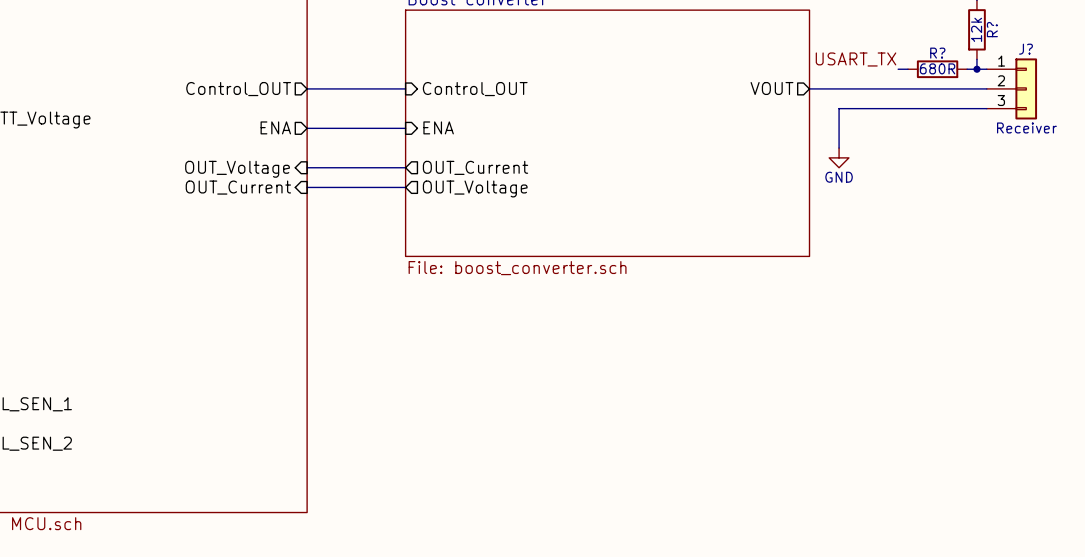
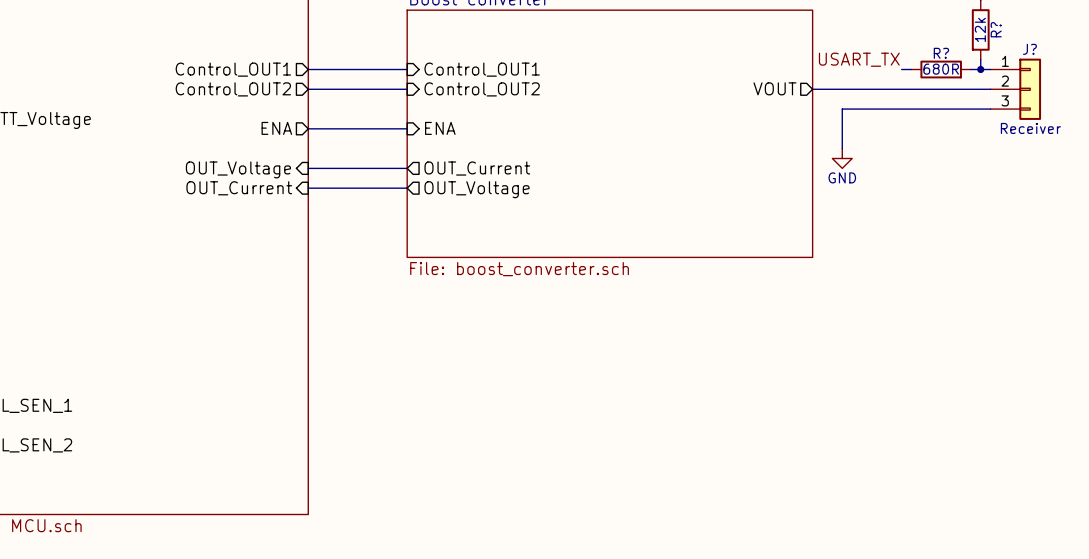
sheet pin: none -> Control_OUT1 (233, 69)
wire: none -> (308, 69) (407, 69)
sheet pin: none -> Control_OUT1 (482, 69)
sheet pin: Control_OUT (238, 89) -> Control_OUT2 (233, 89)
sheet pin: Control_OUT (475, 89) -> Control_OUT2 (482, 89)

